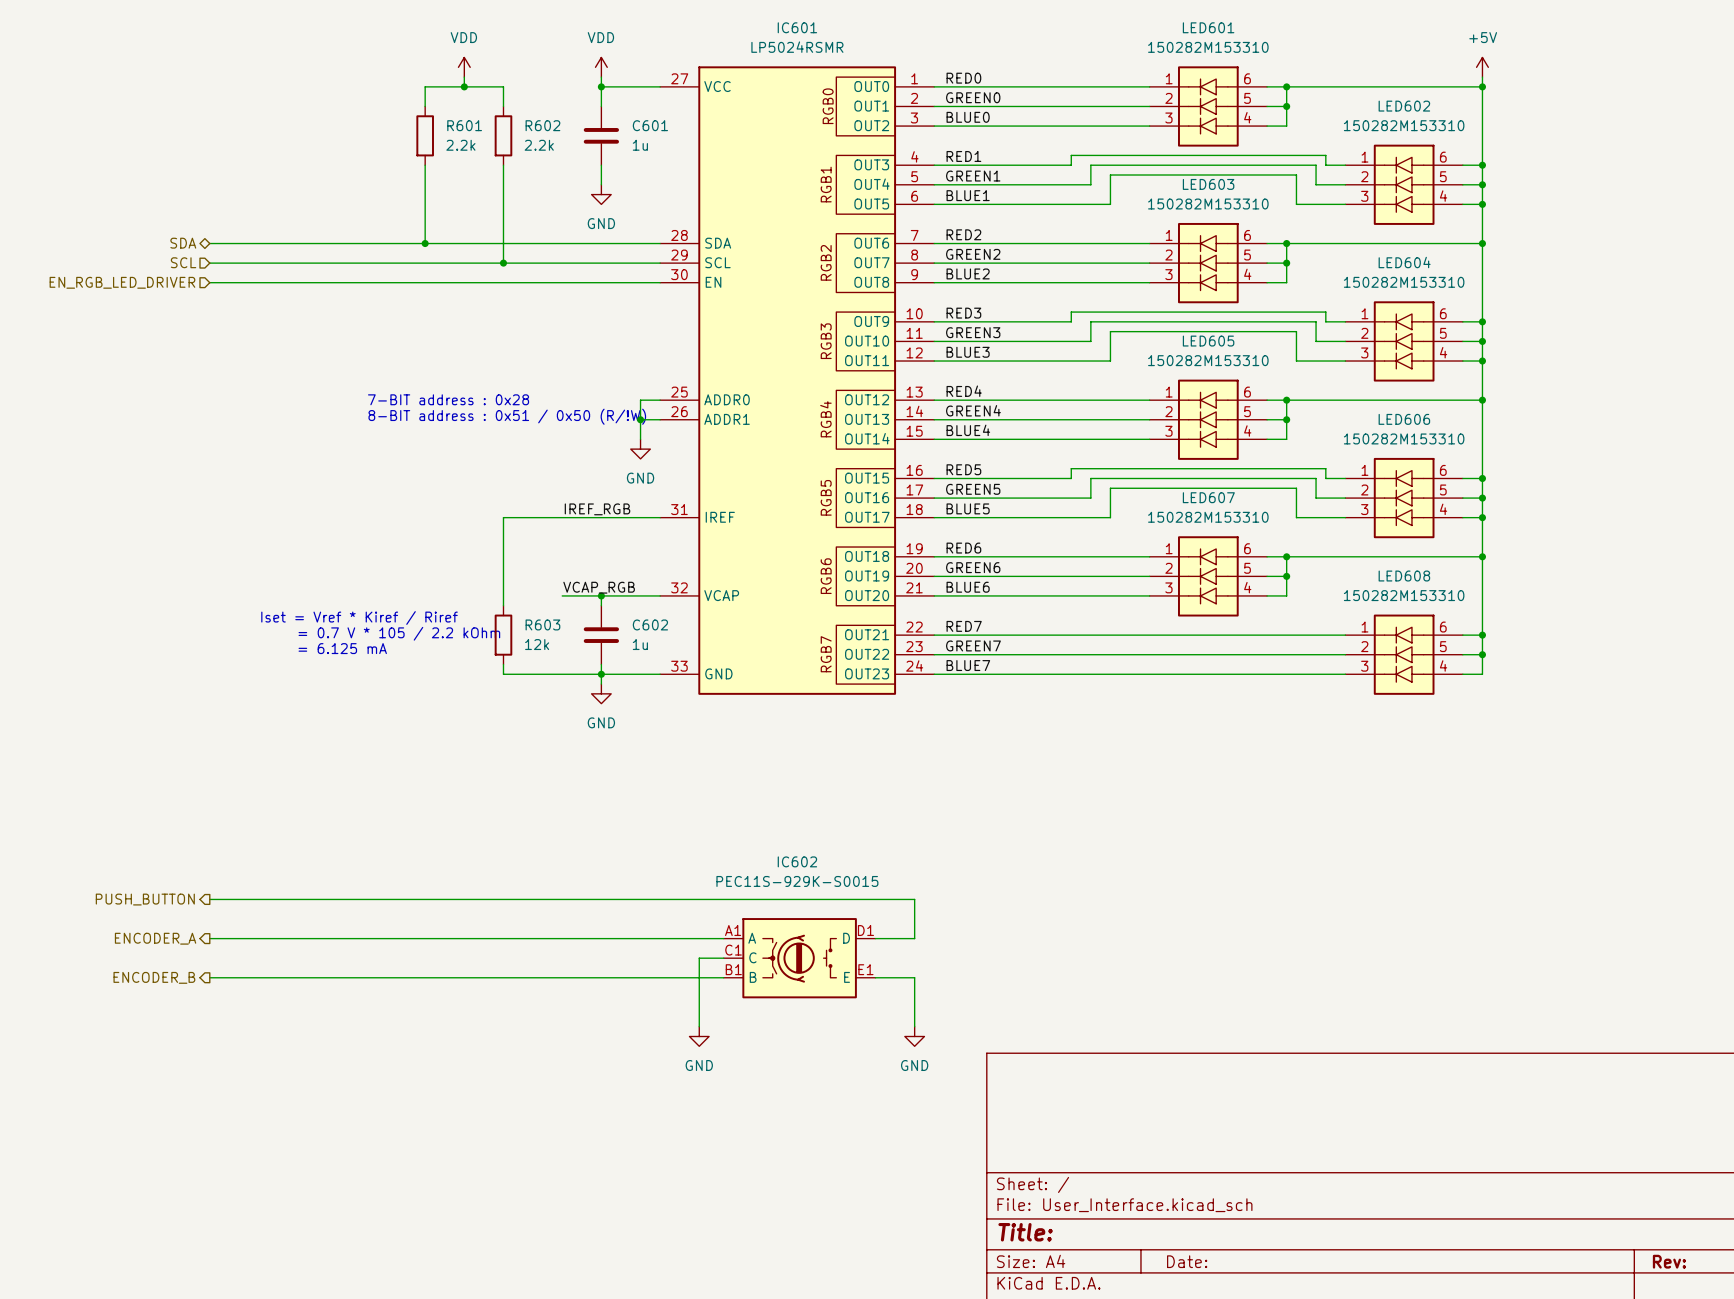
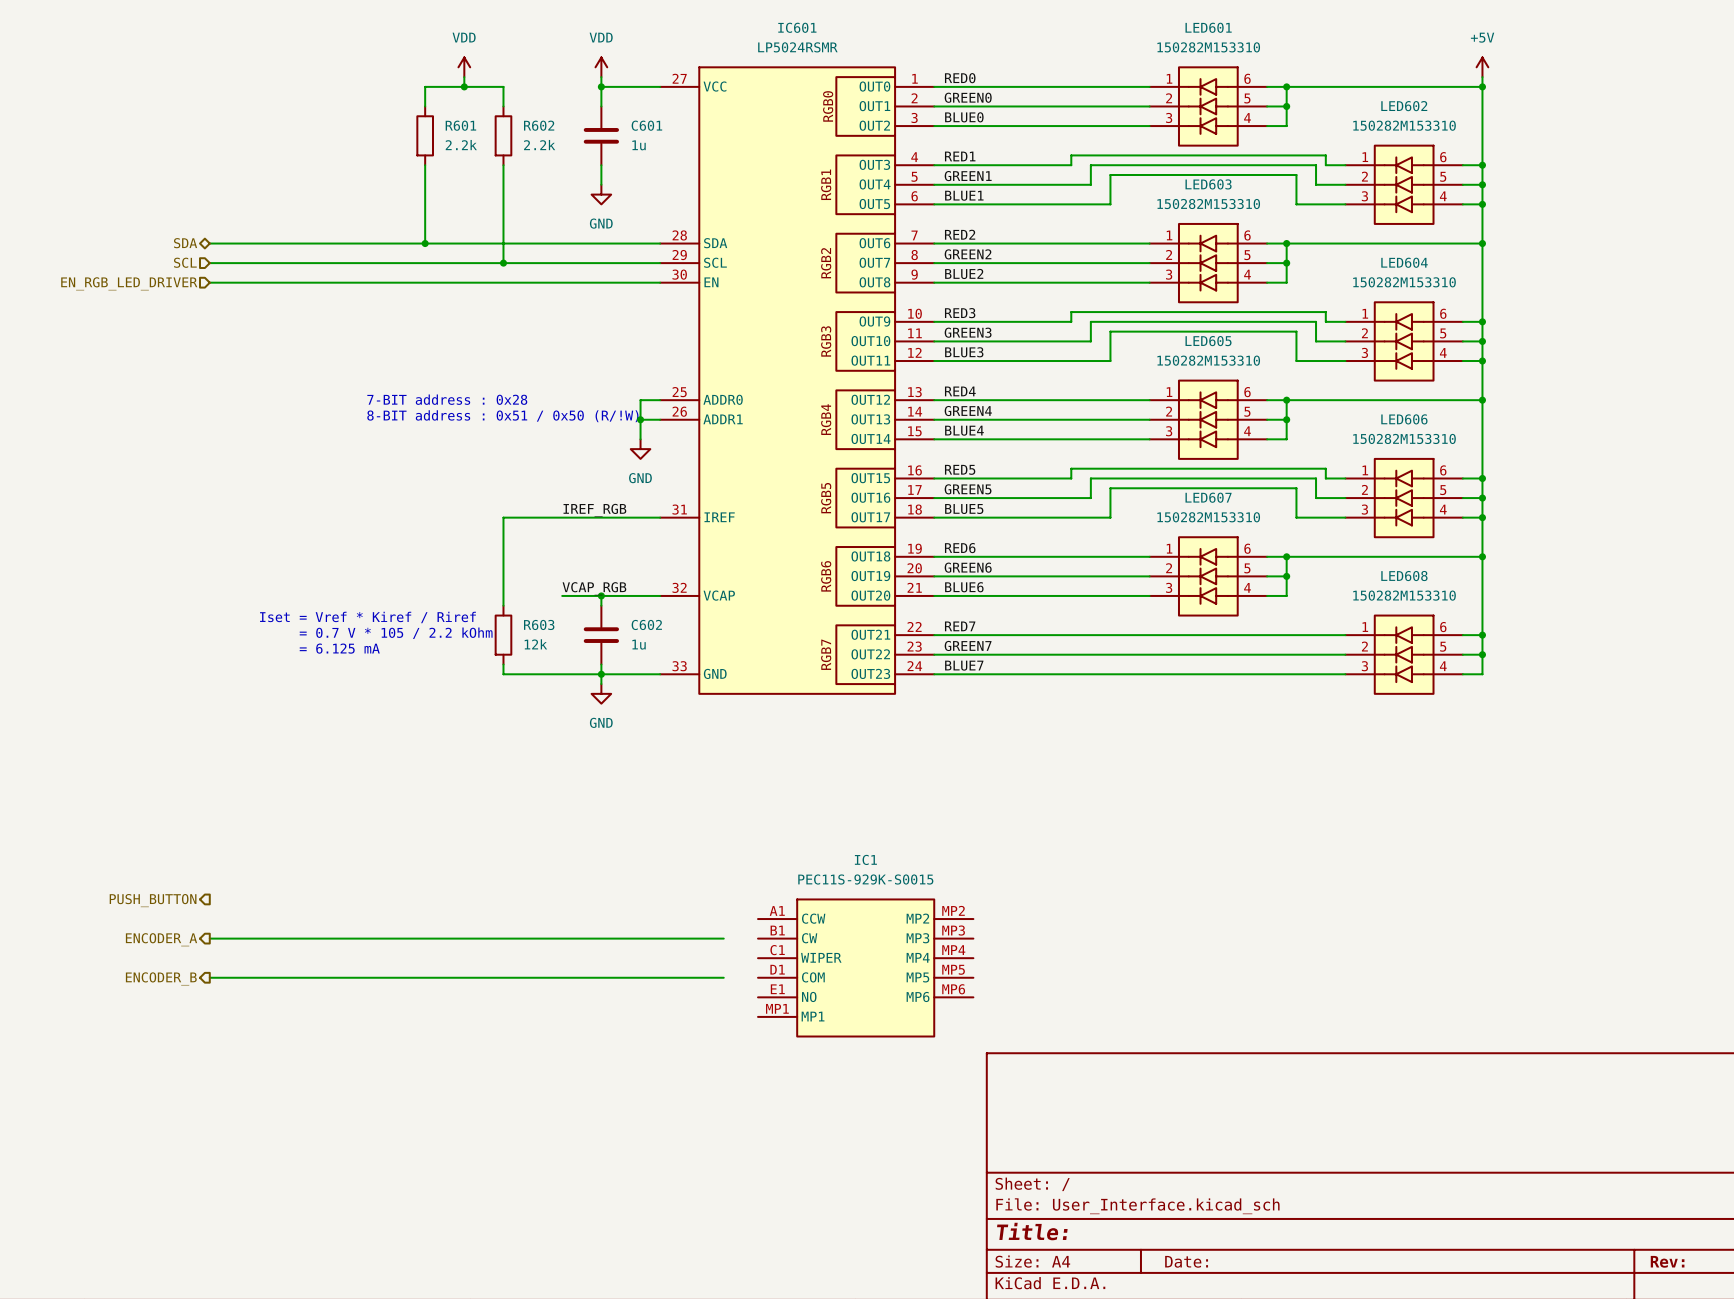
wire: (209, 899) (914, 899) (914, 938) (875, 938) -> none
wire: (723, 958) (699, 958) (699, 1026) -> none
IC602: PEC11S-929K-S0015 (799, 958) -> none
IC1: none -> PEC11S-929K-S0015 (865, 967)
power symbol: GND (699, 1036) -> none
power symbol: GND (914, 1036) -> none

